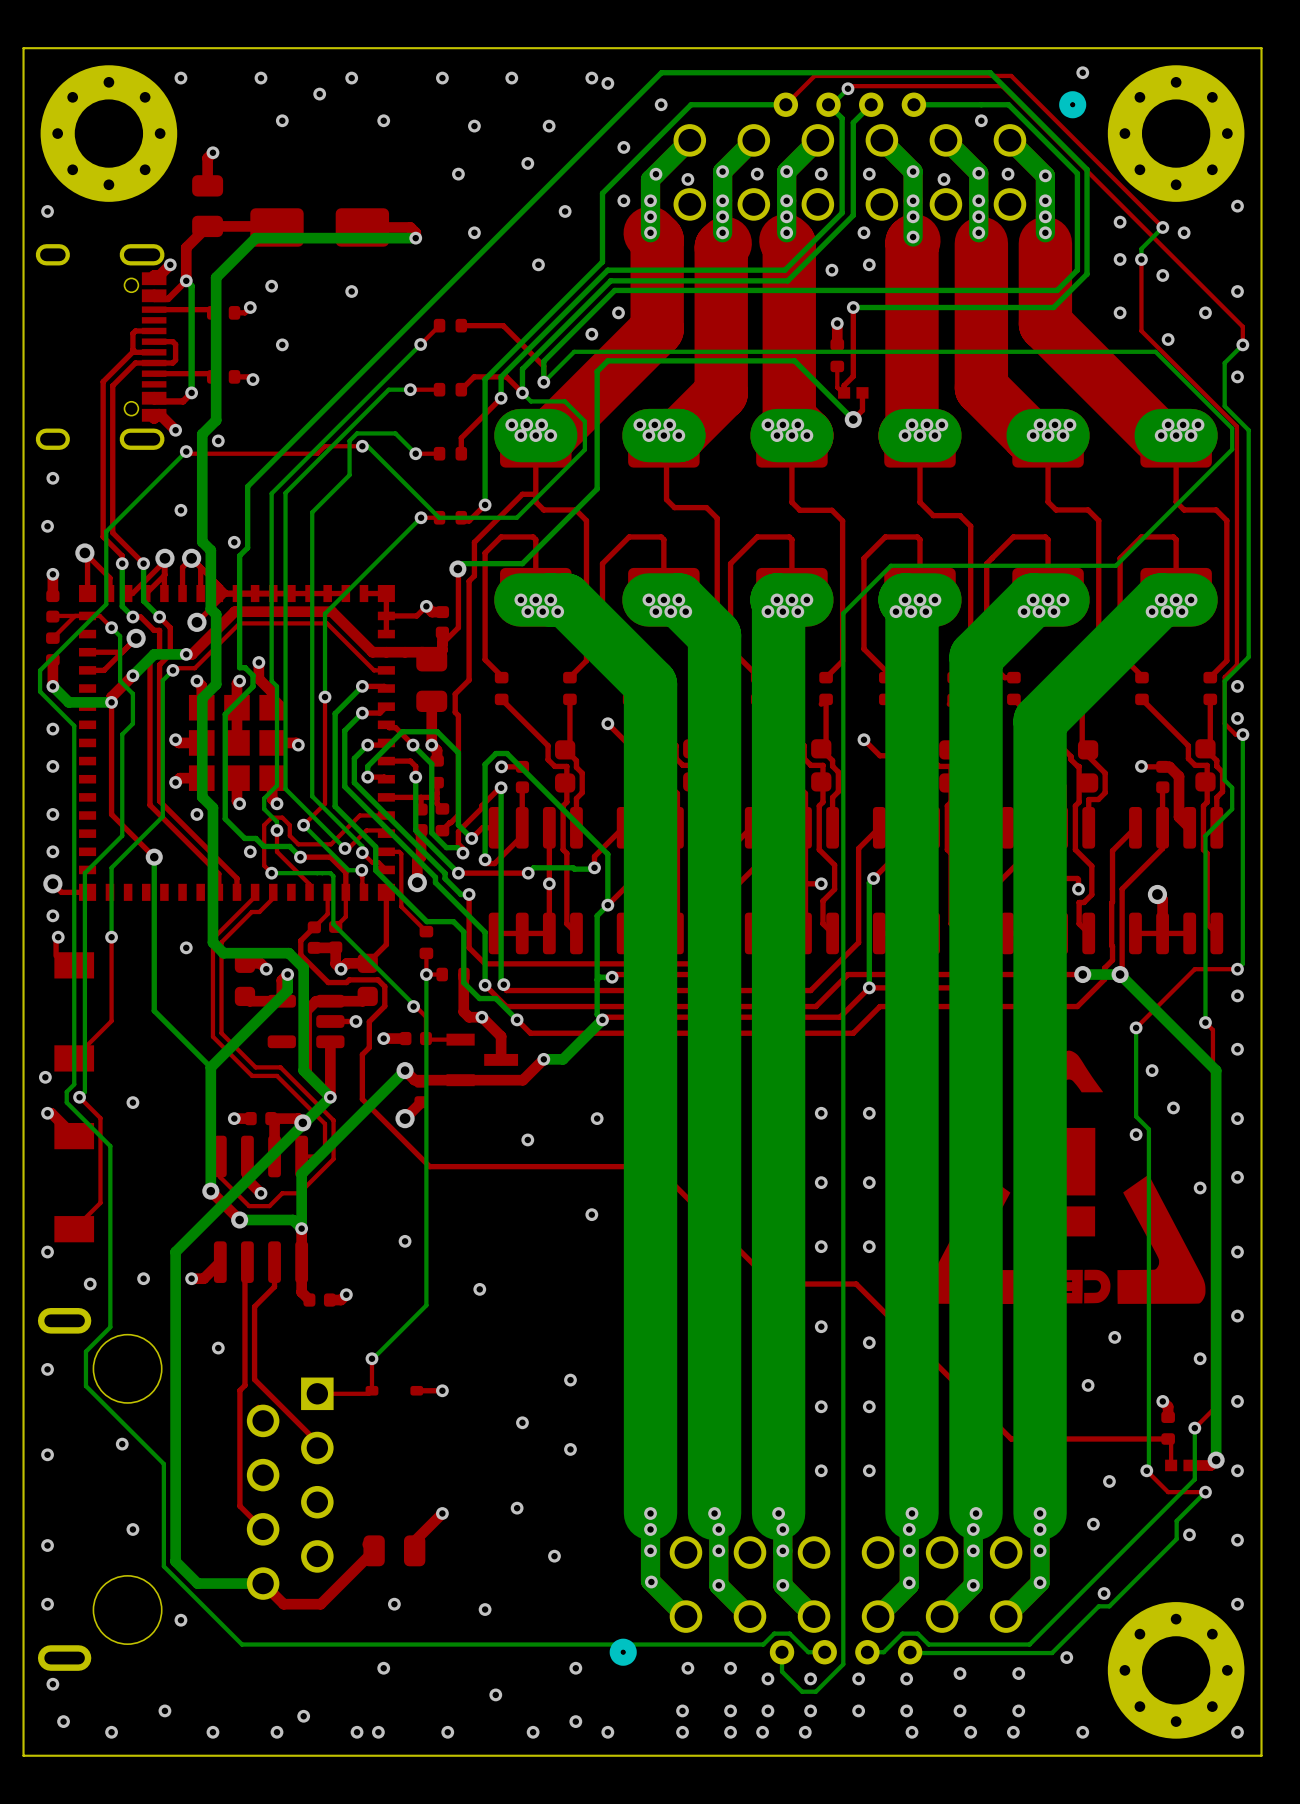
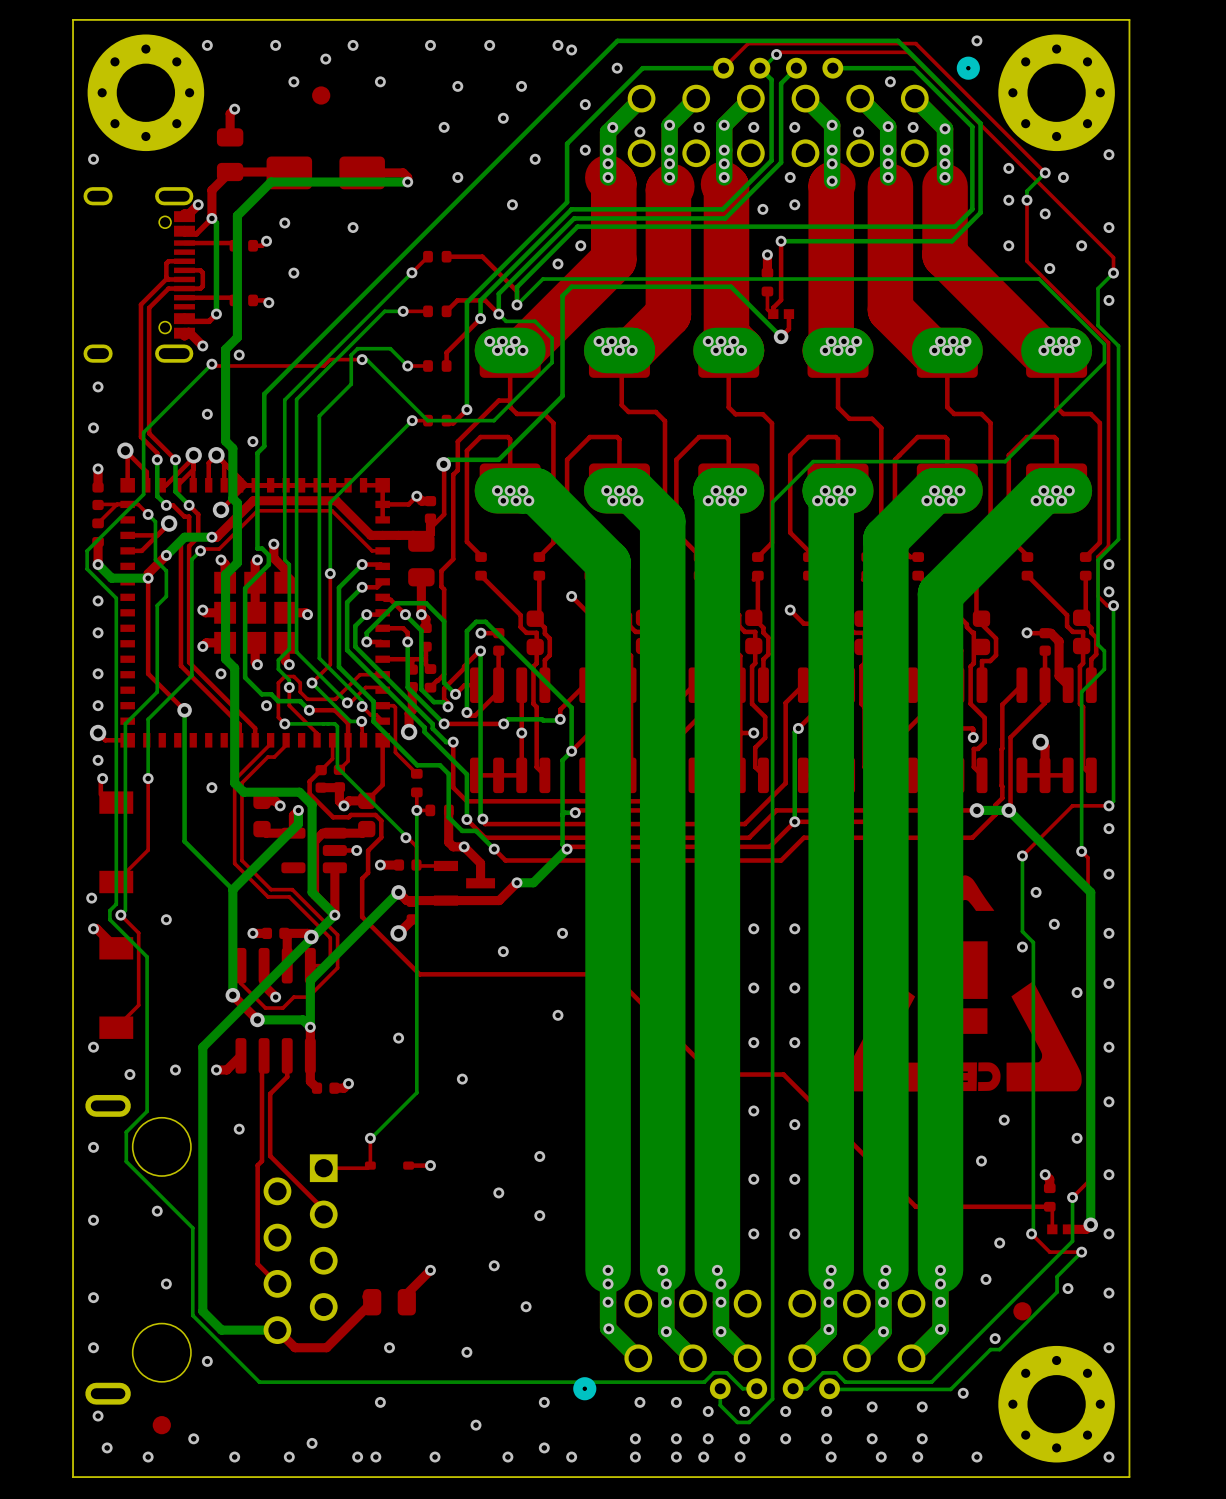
part: none -> (321, 95)
part: none -> (1022, 1311)
part: none -> (161, 1425)

